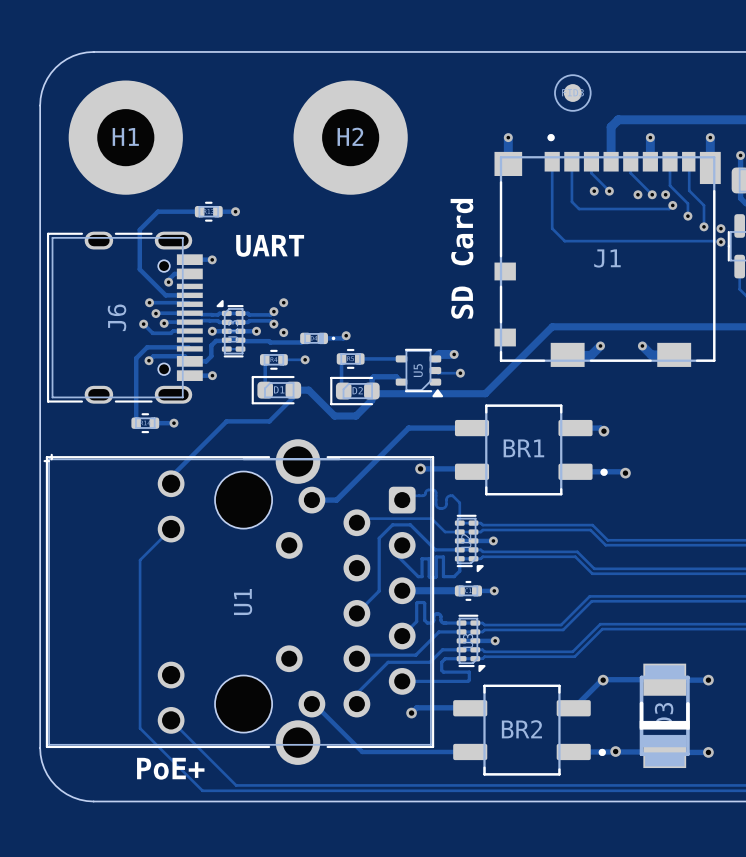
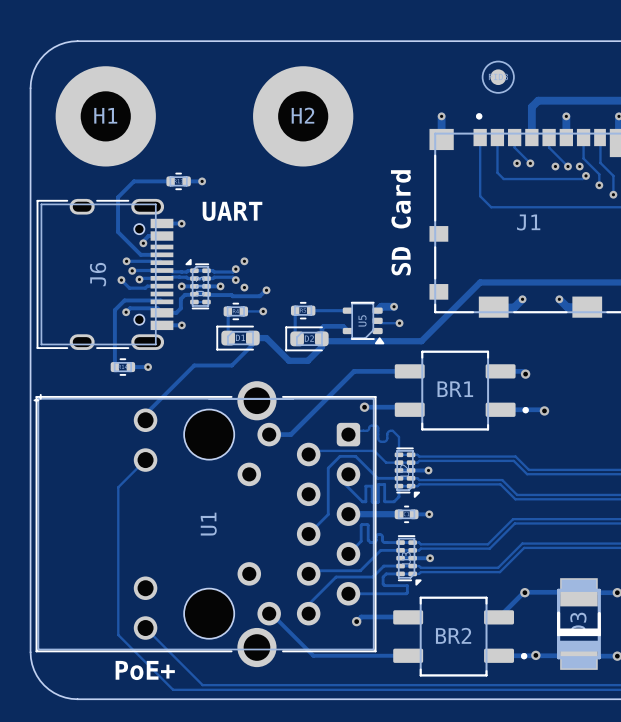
track: (346, 335) (343, 338) (322, 338) -> none
via position: (346, 335) -> (266, 290)
part: (317, 338) -> none

